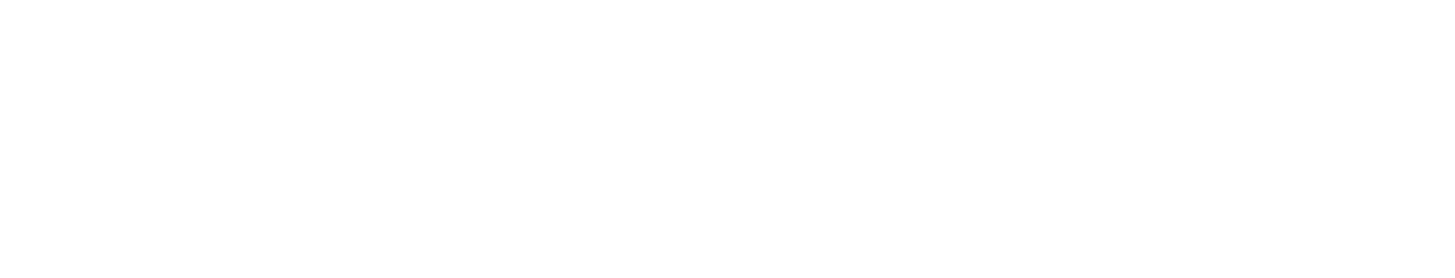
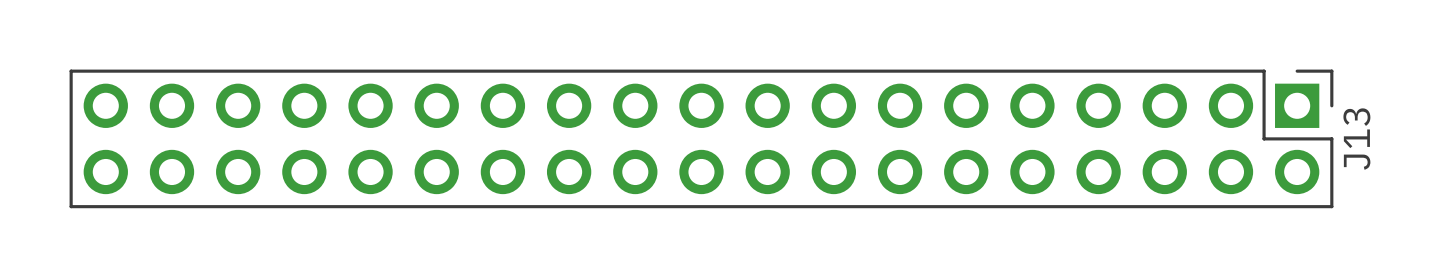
J13: none -> (701, 138)

